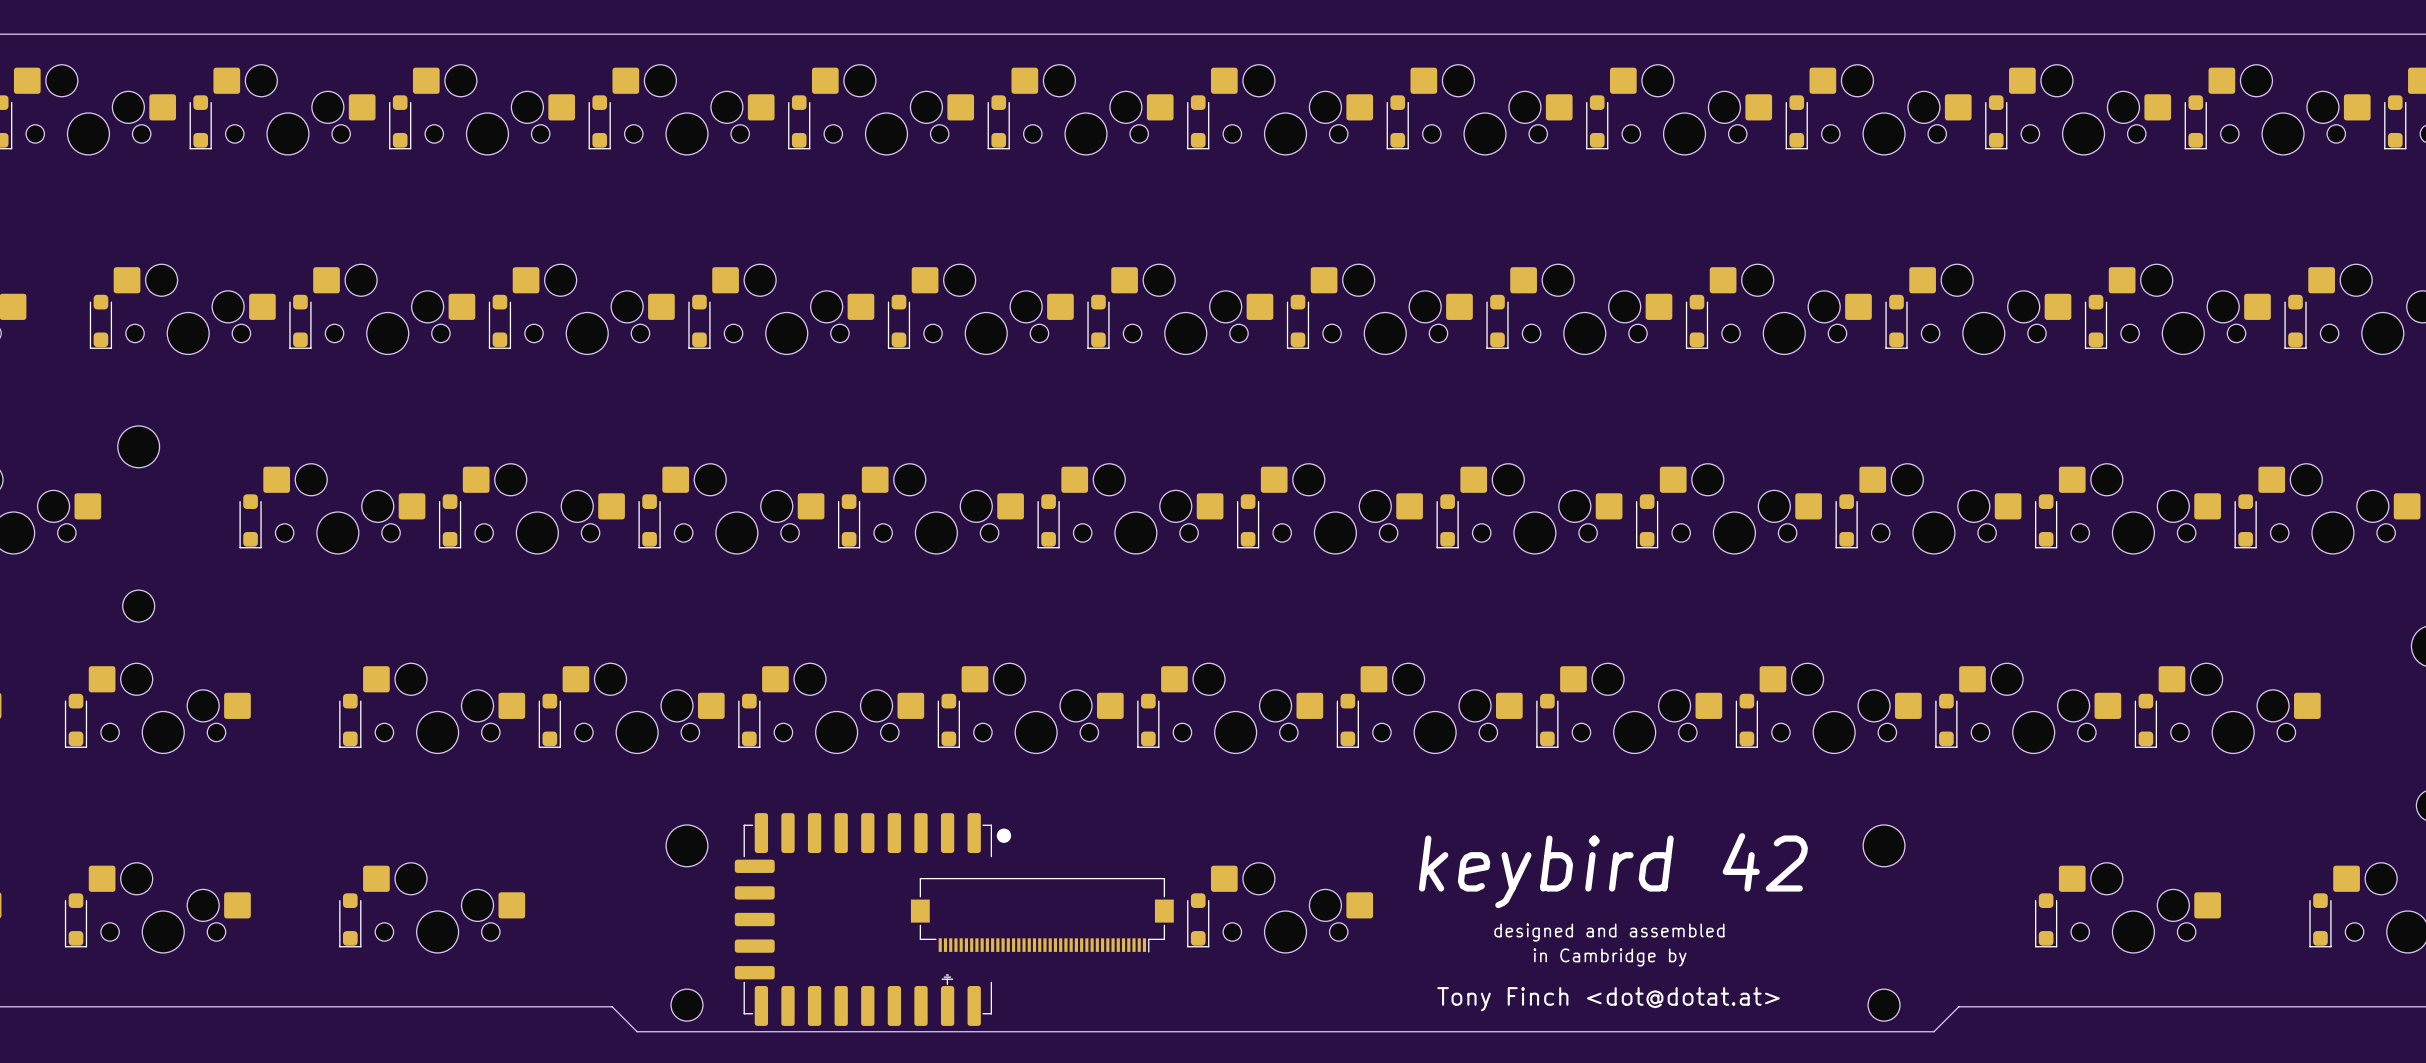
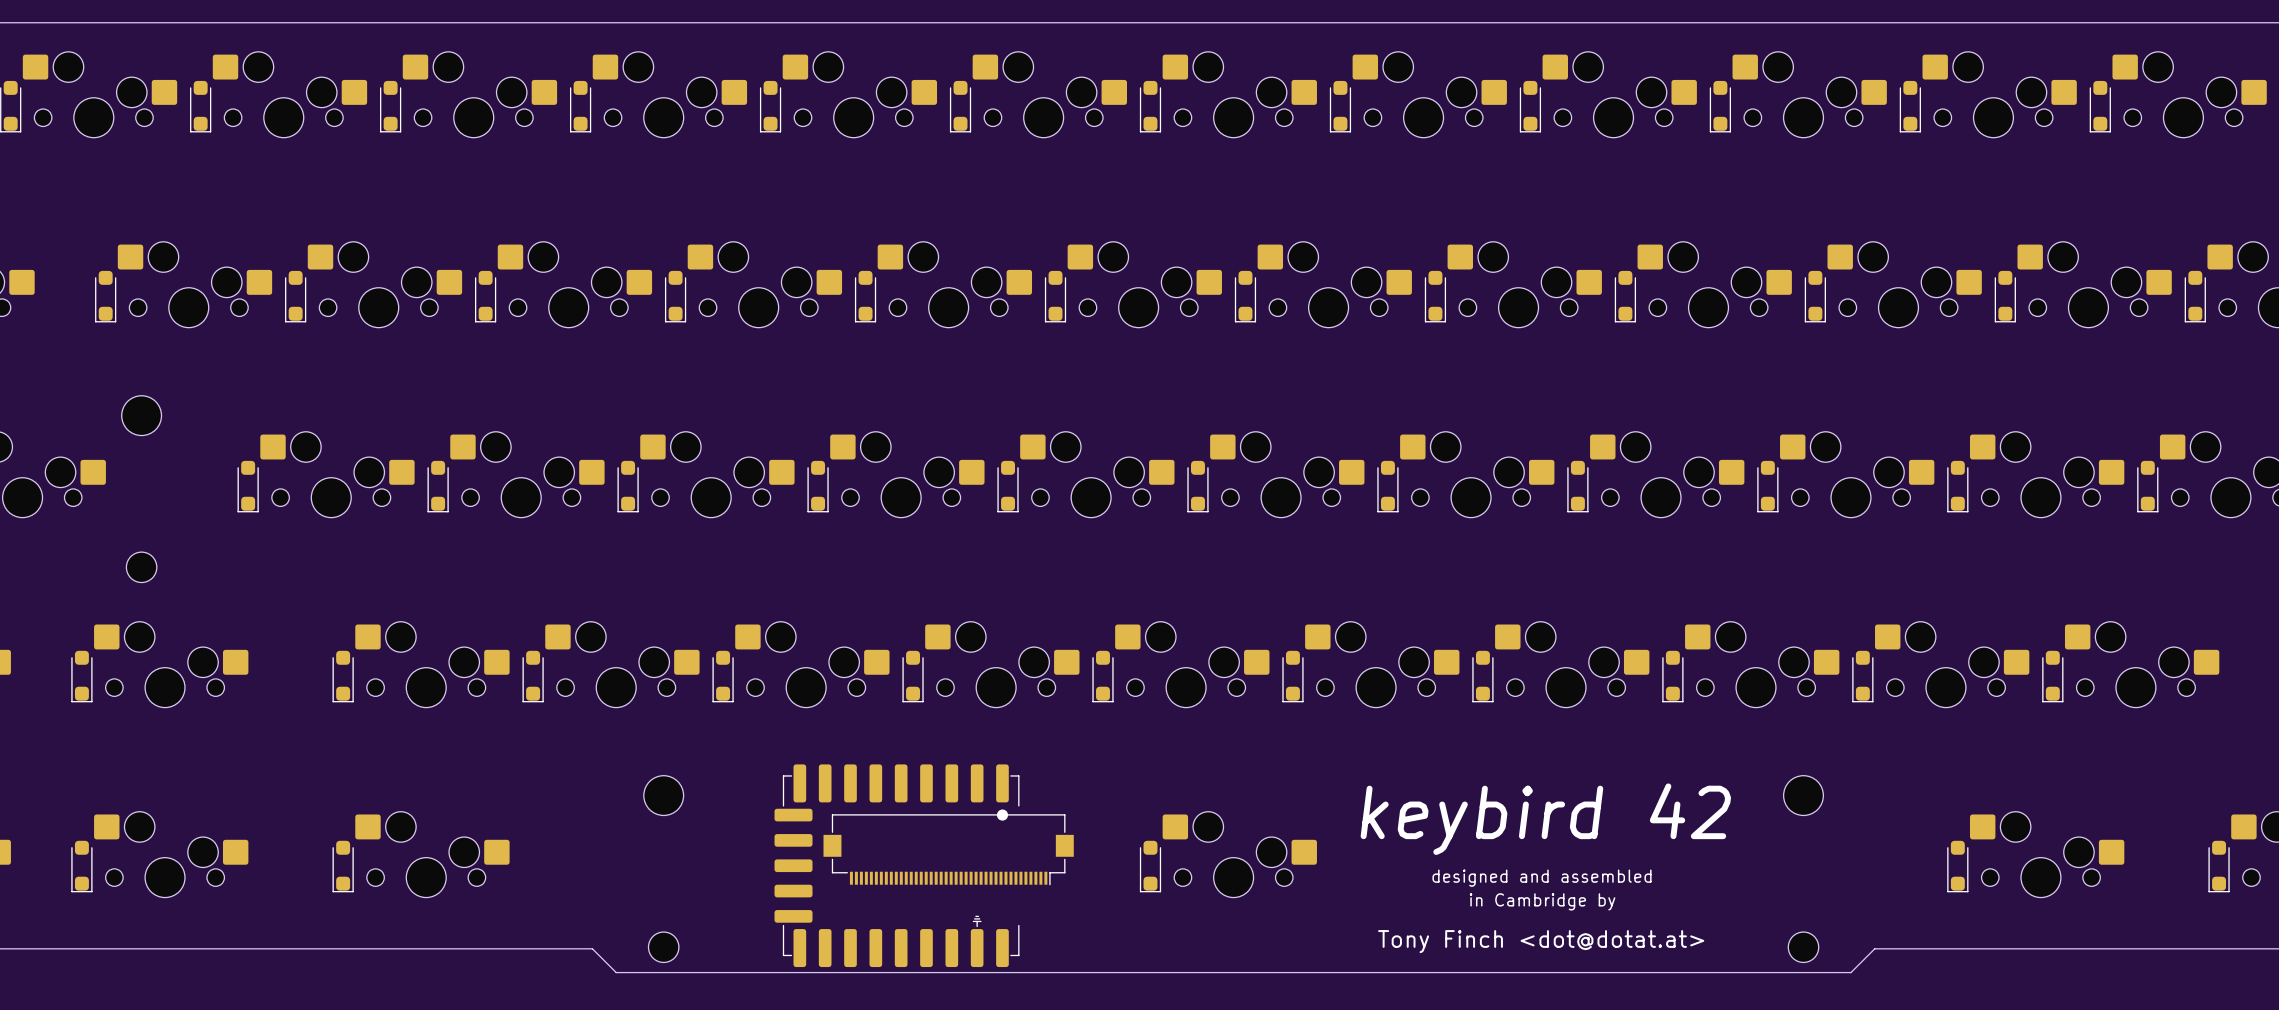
part position: (1042, 915) -> (948, 849)
part: (872, 919) -> none
part: none -> (896, 865)

